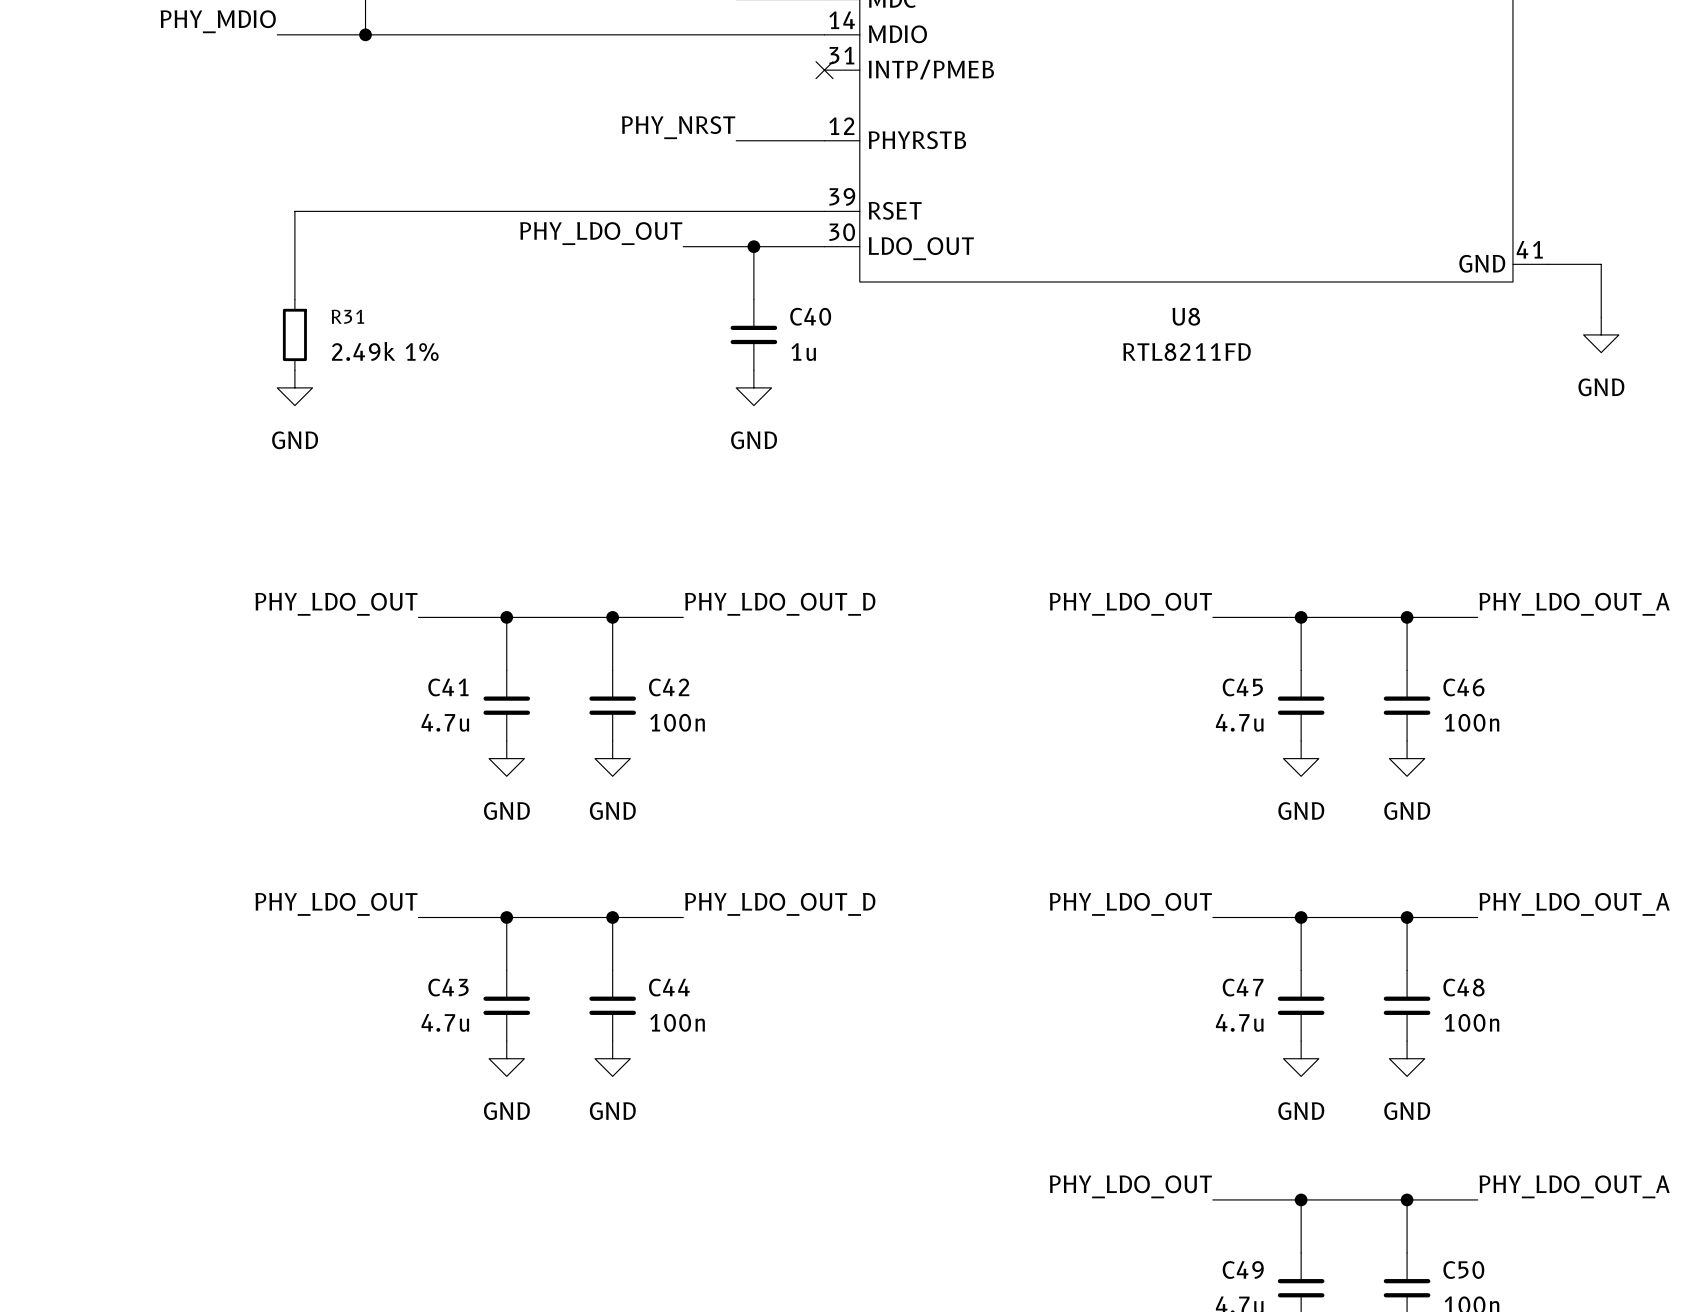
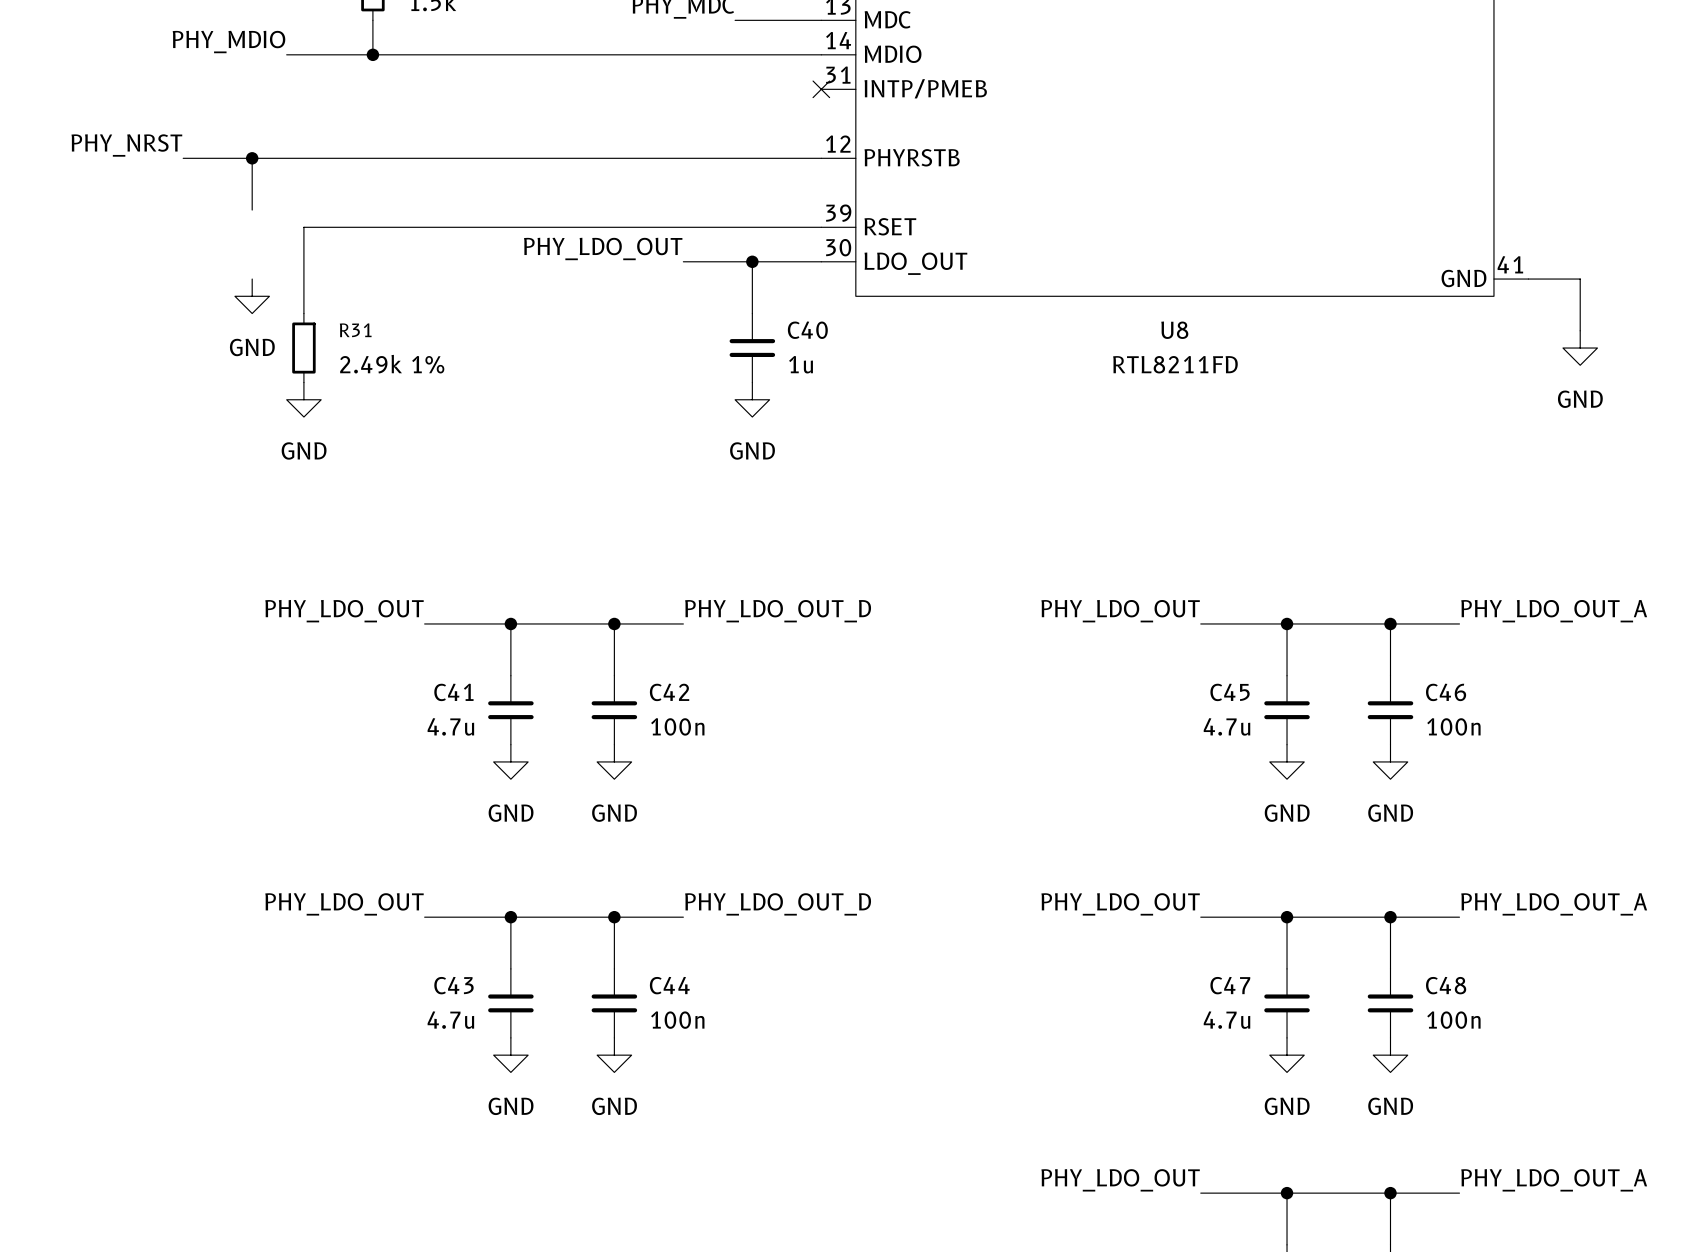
label: none -> PHY_NRST (126, 145)
label: PHY_NRST (678, 127) -> none
wire: none -> (183, 158) (735, 158)
wire: none -> (252, 158) (252, 210)
junction: none -> (252, 158)
power symbol: none -> GND (252, 296)

